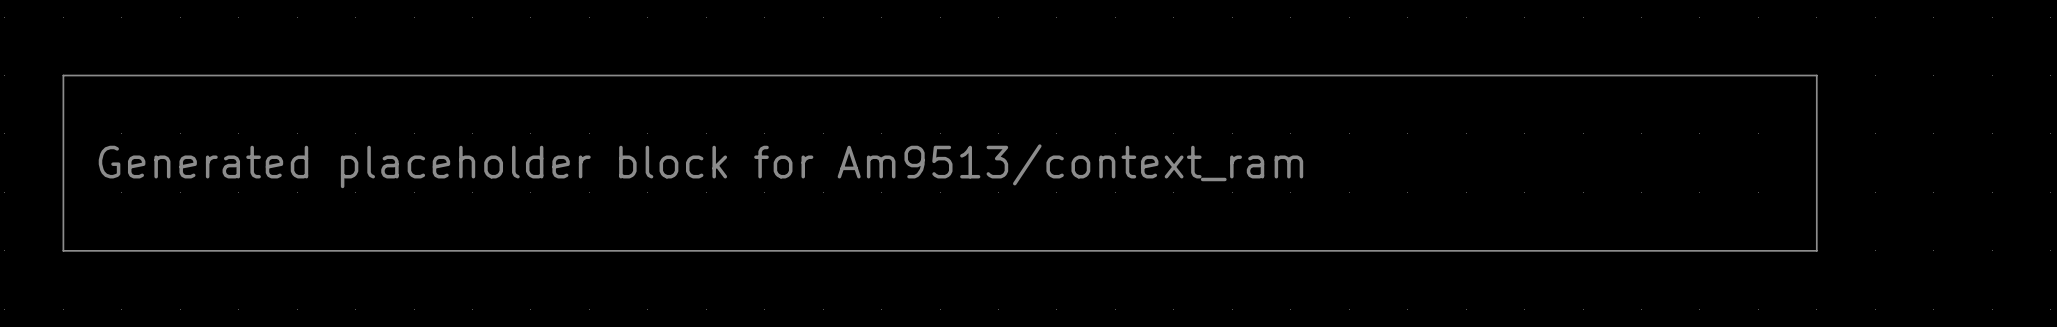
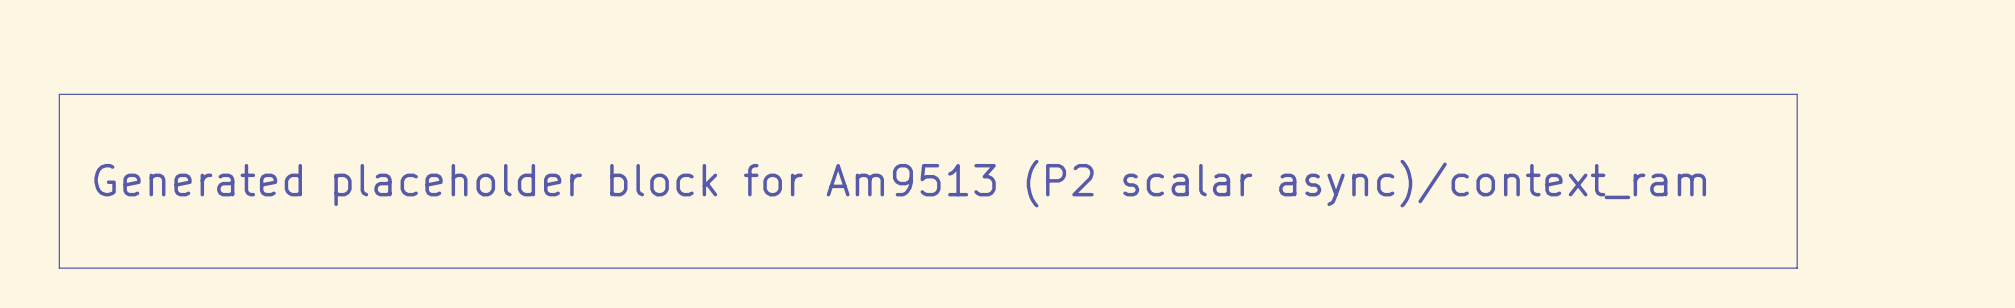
text: Generated placeholder block for Am9513/context_ram (700, 166) -> Generated placeholder block for Am9513 (P2 scalar async)/context_ram (900, 183)

